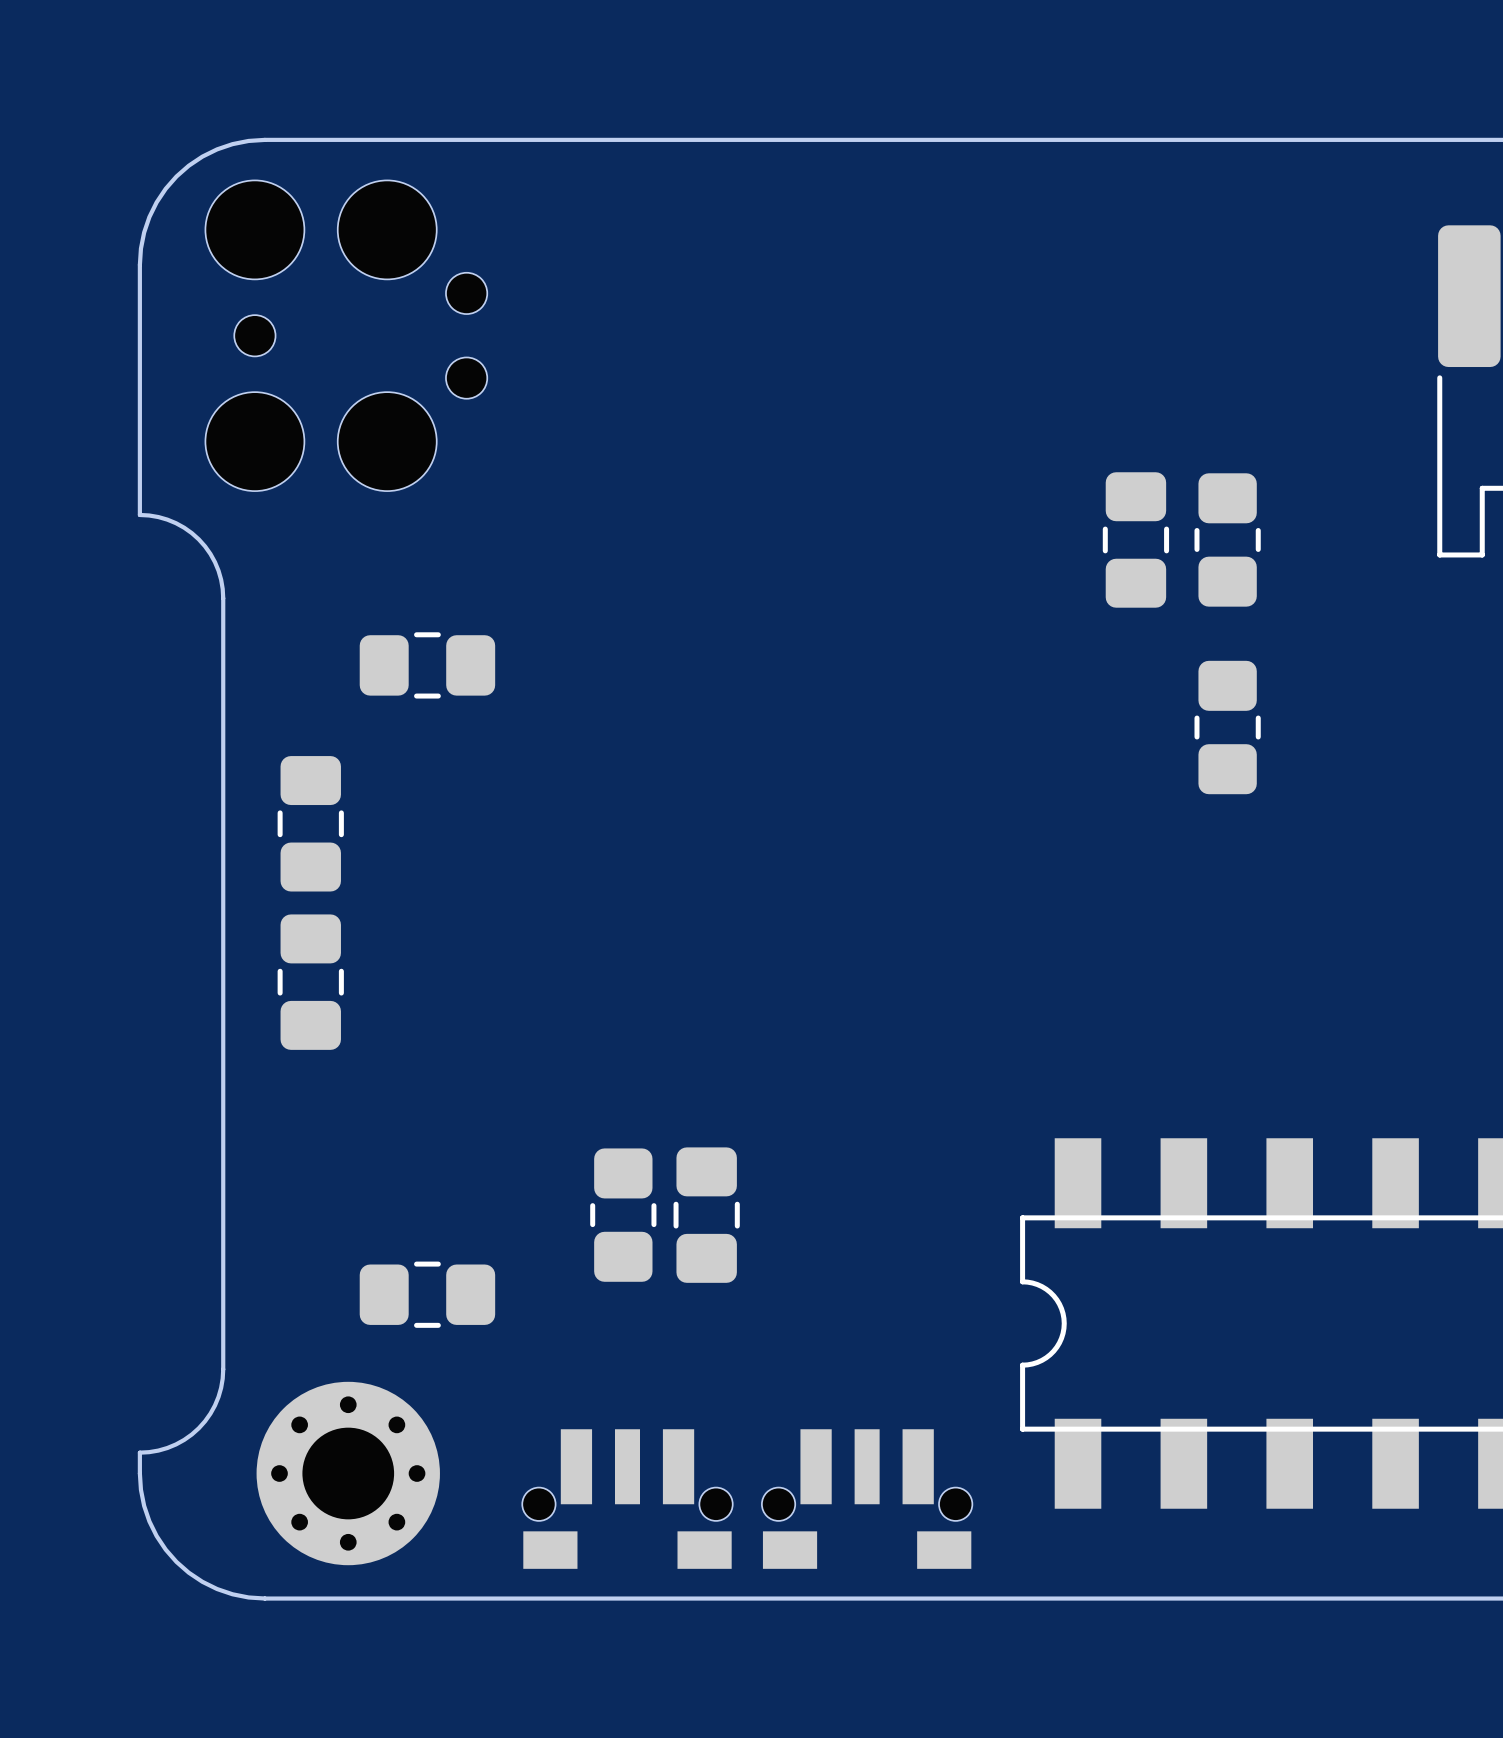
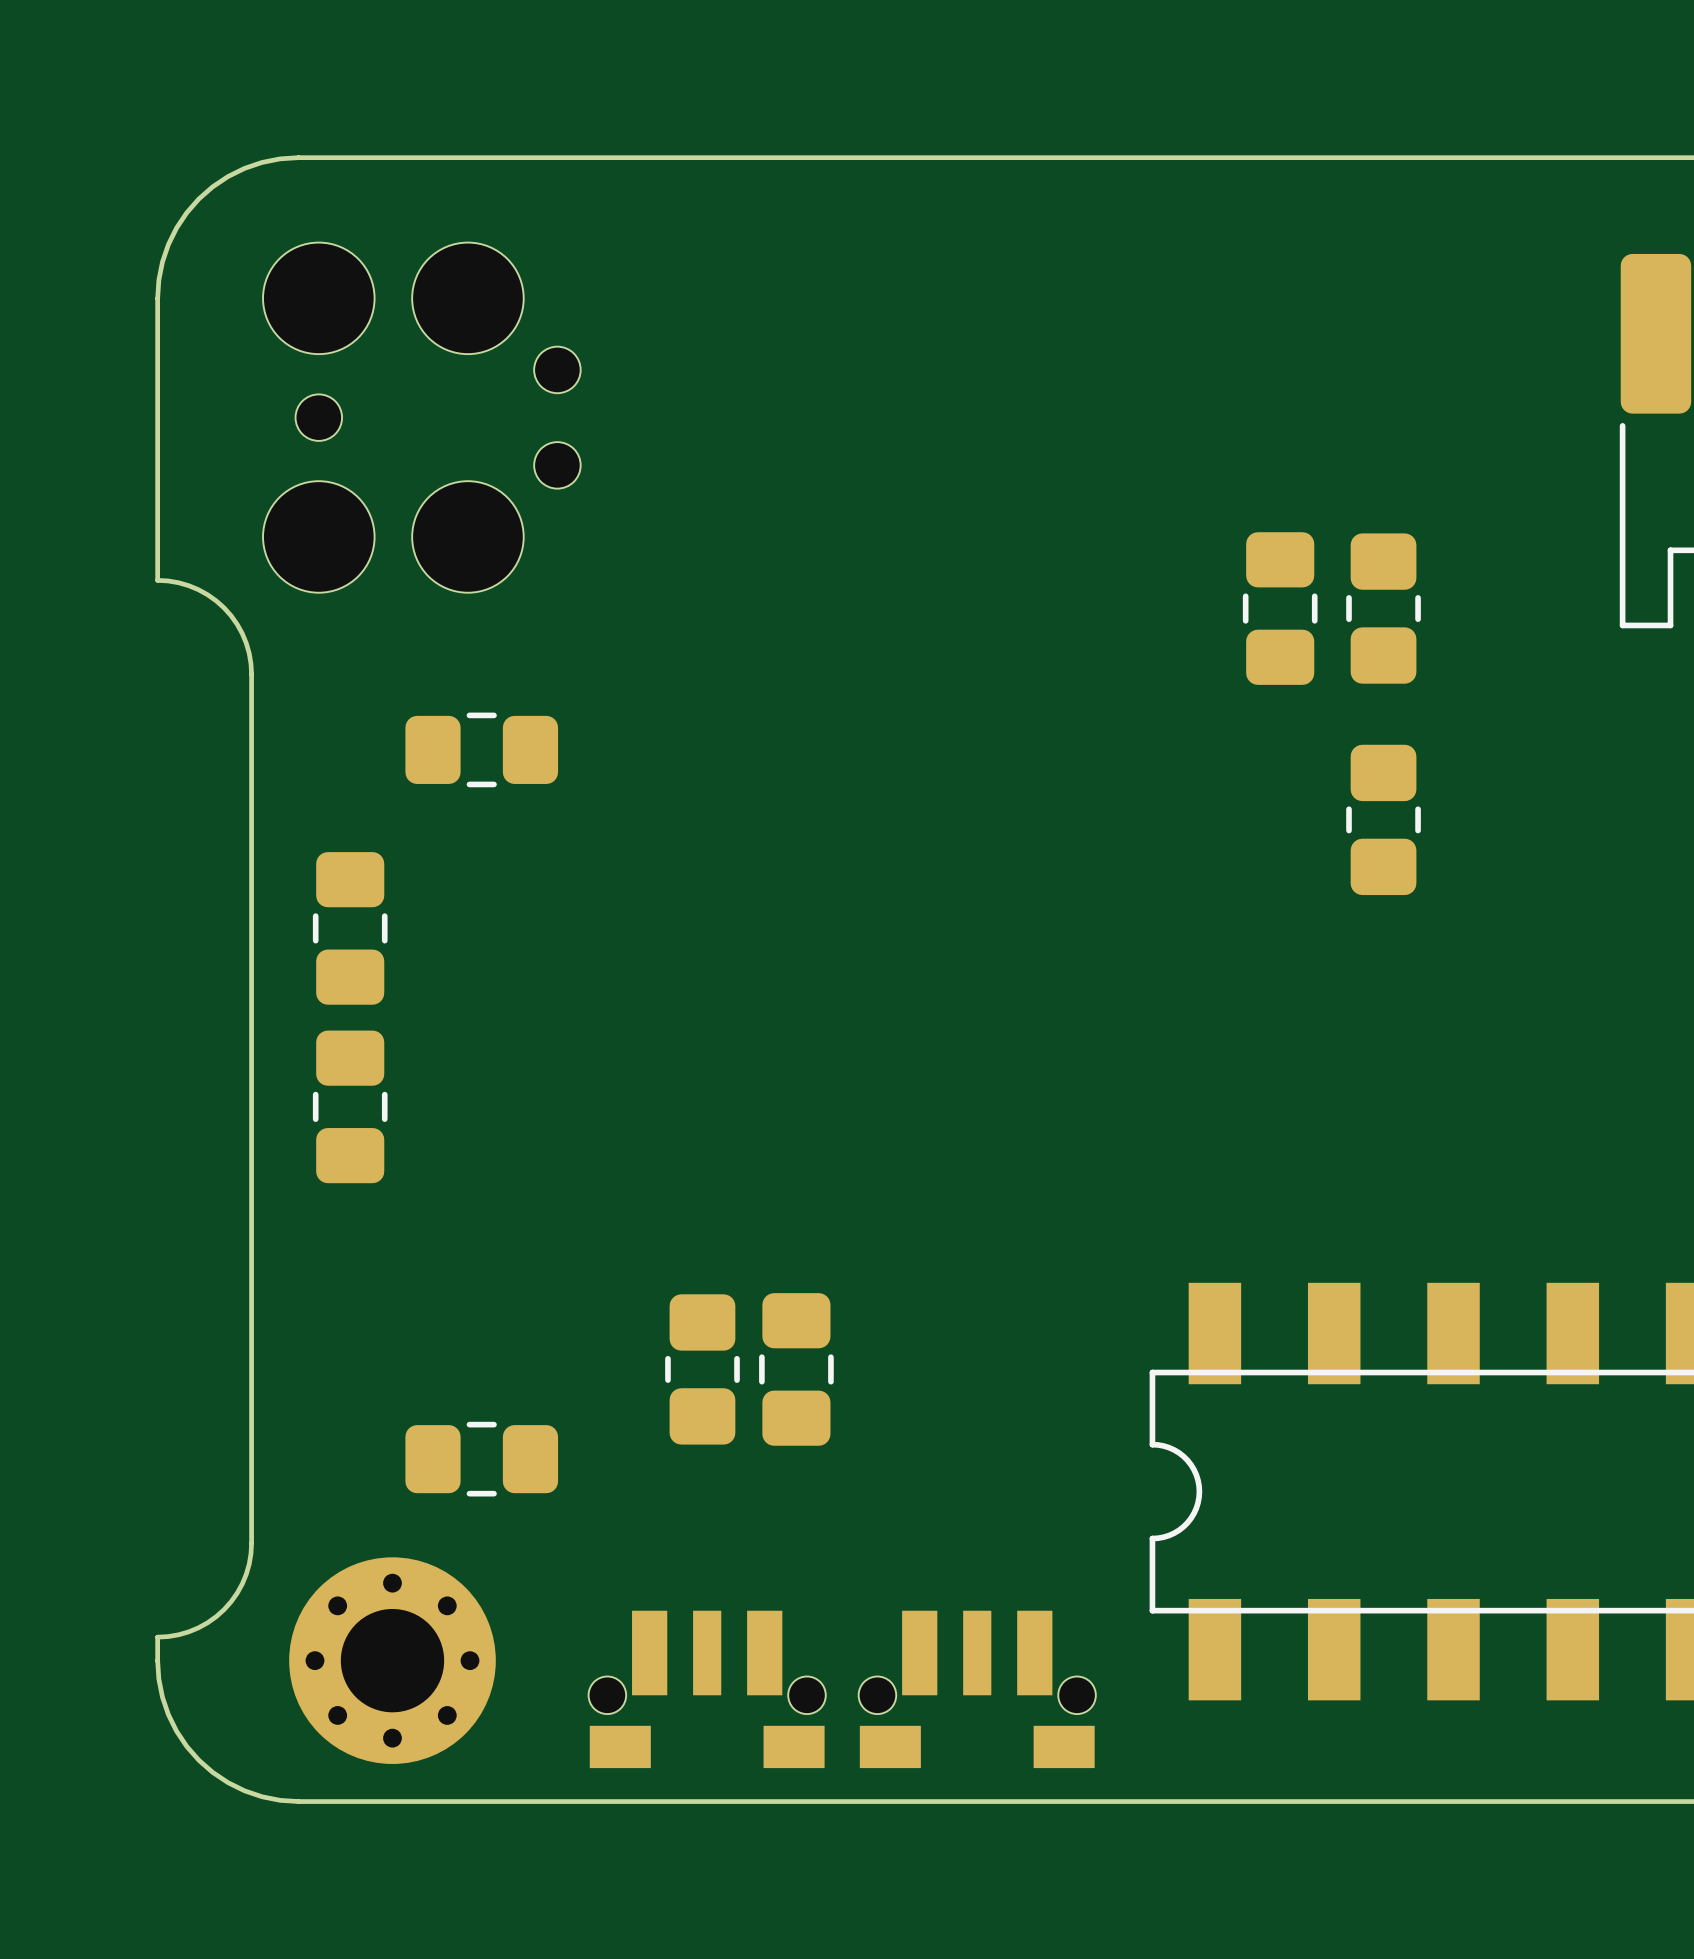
part position: (346, 335) -> (421, 417)

